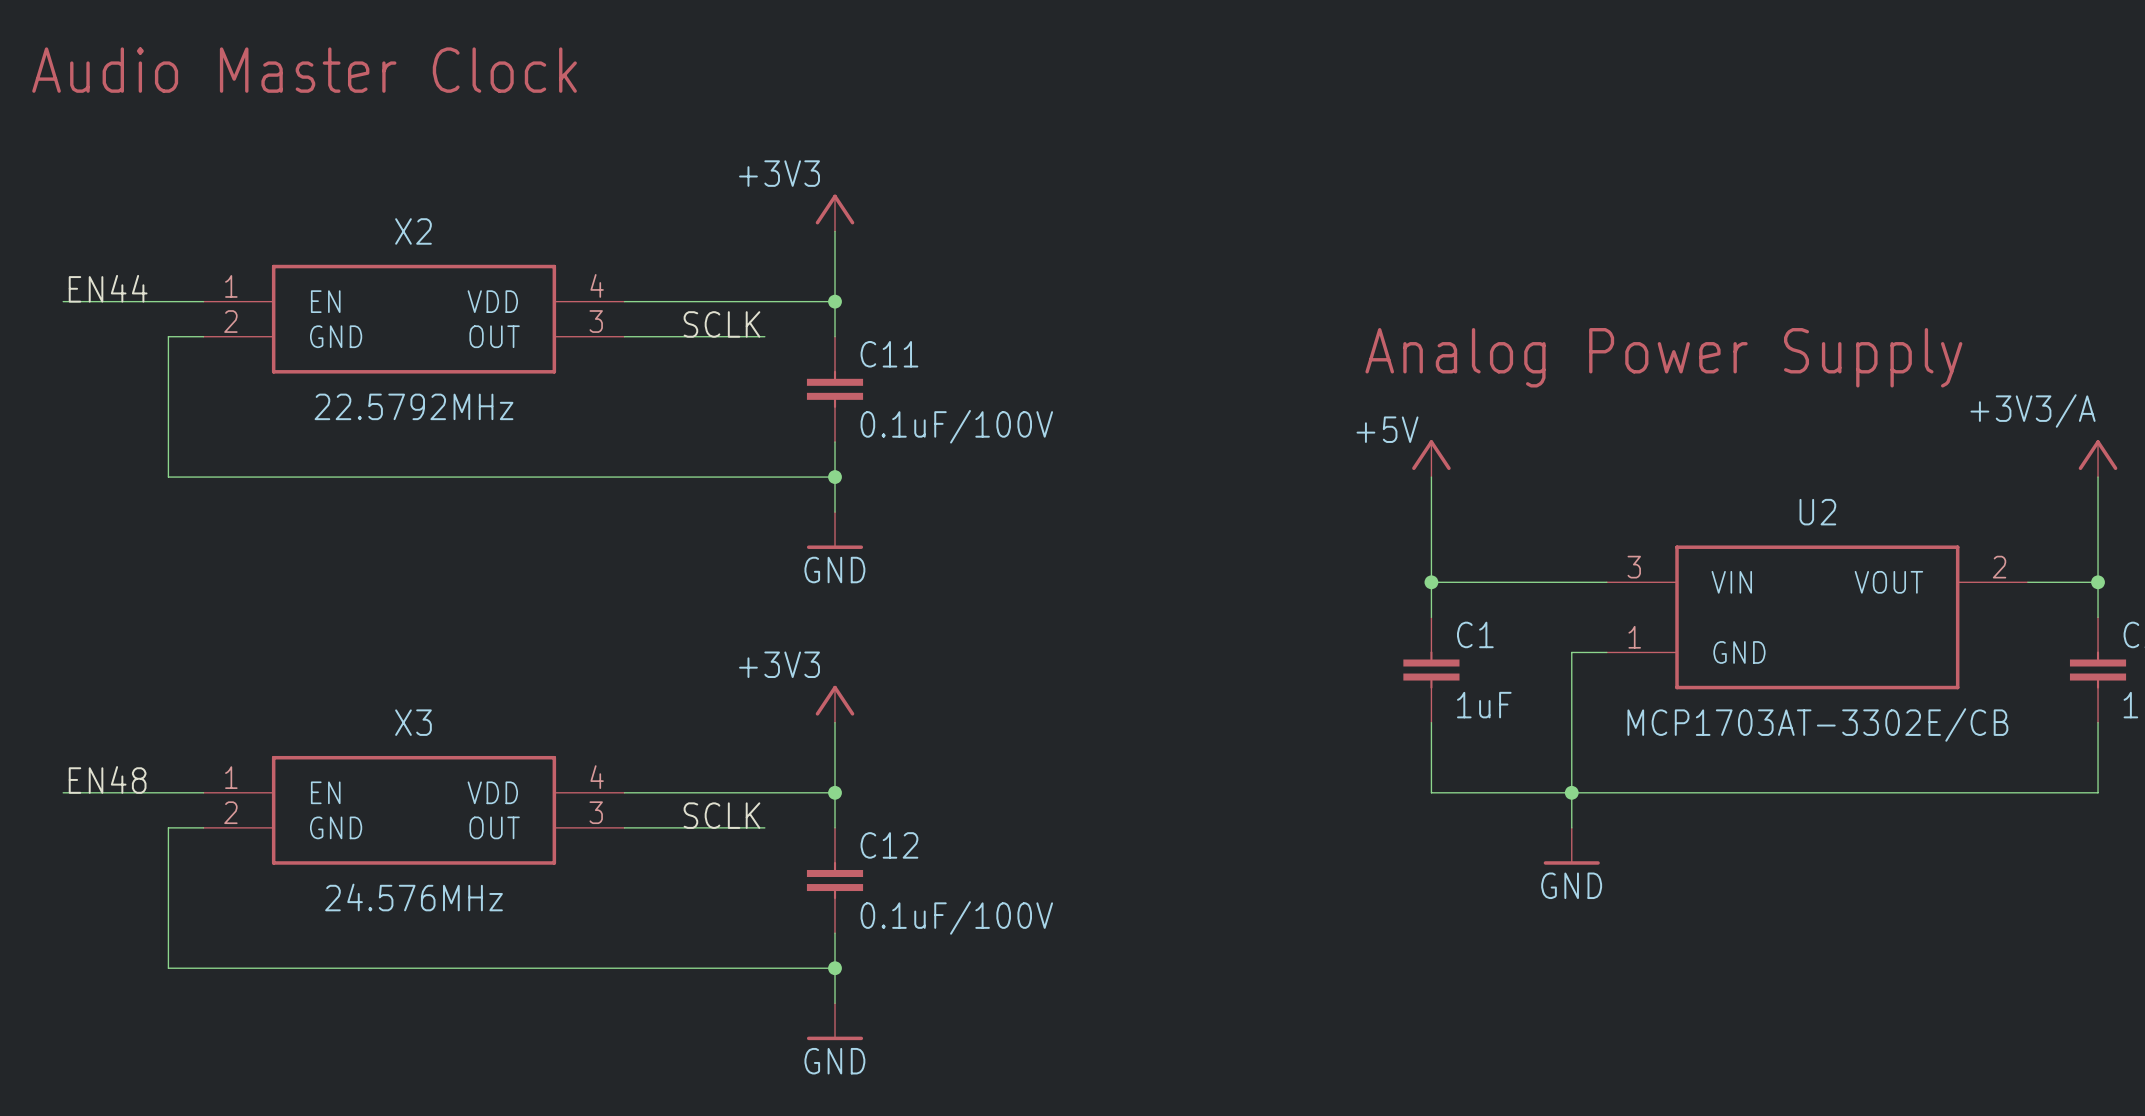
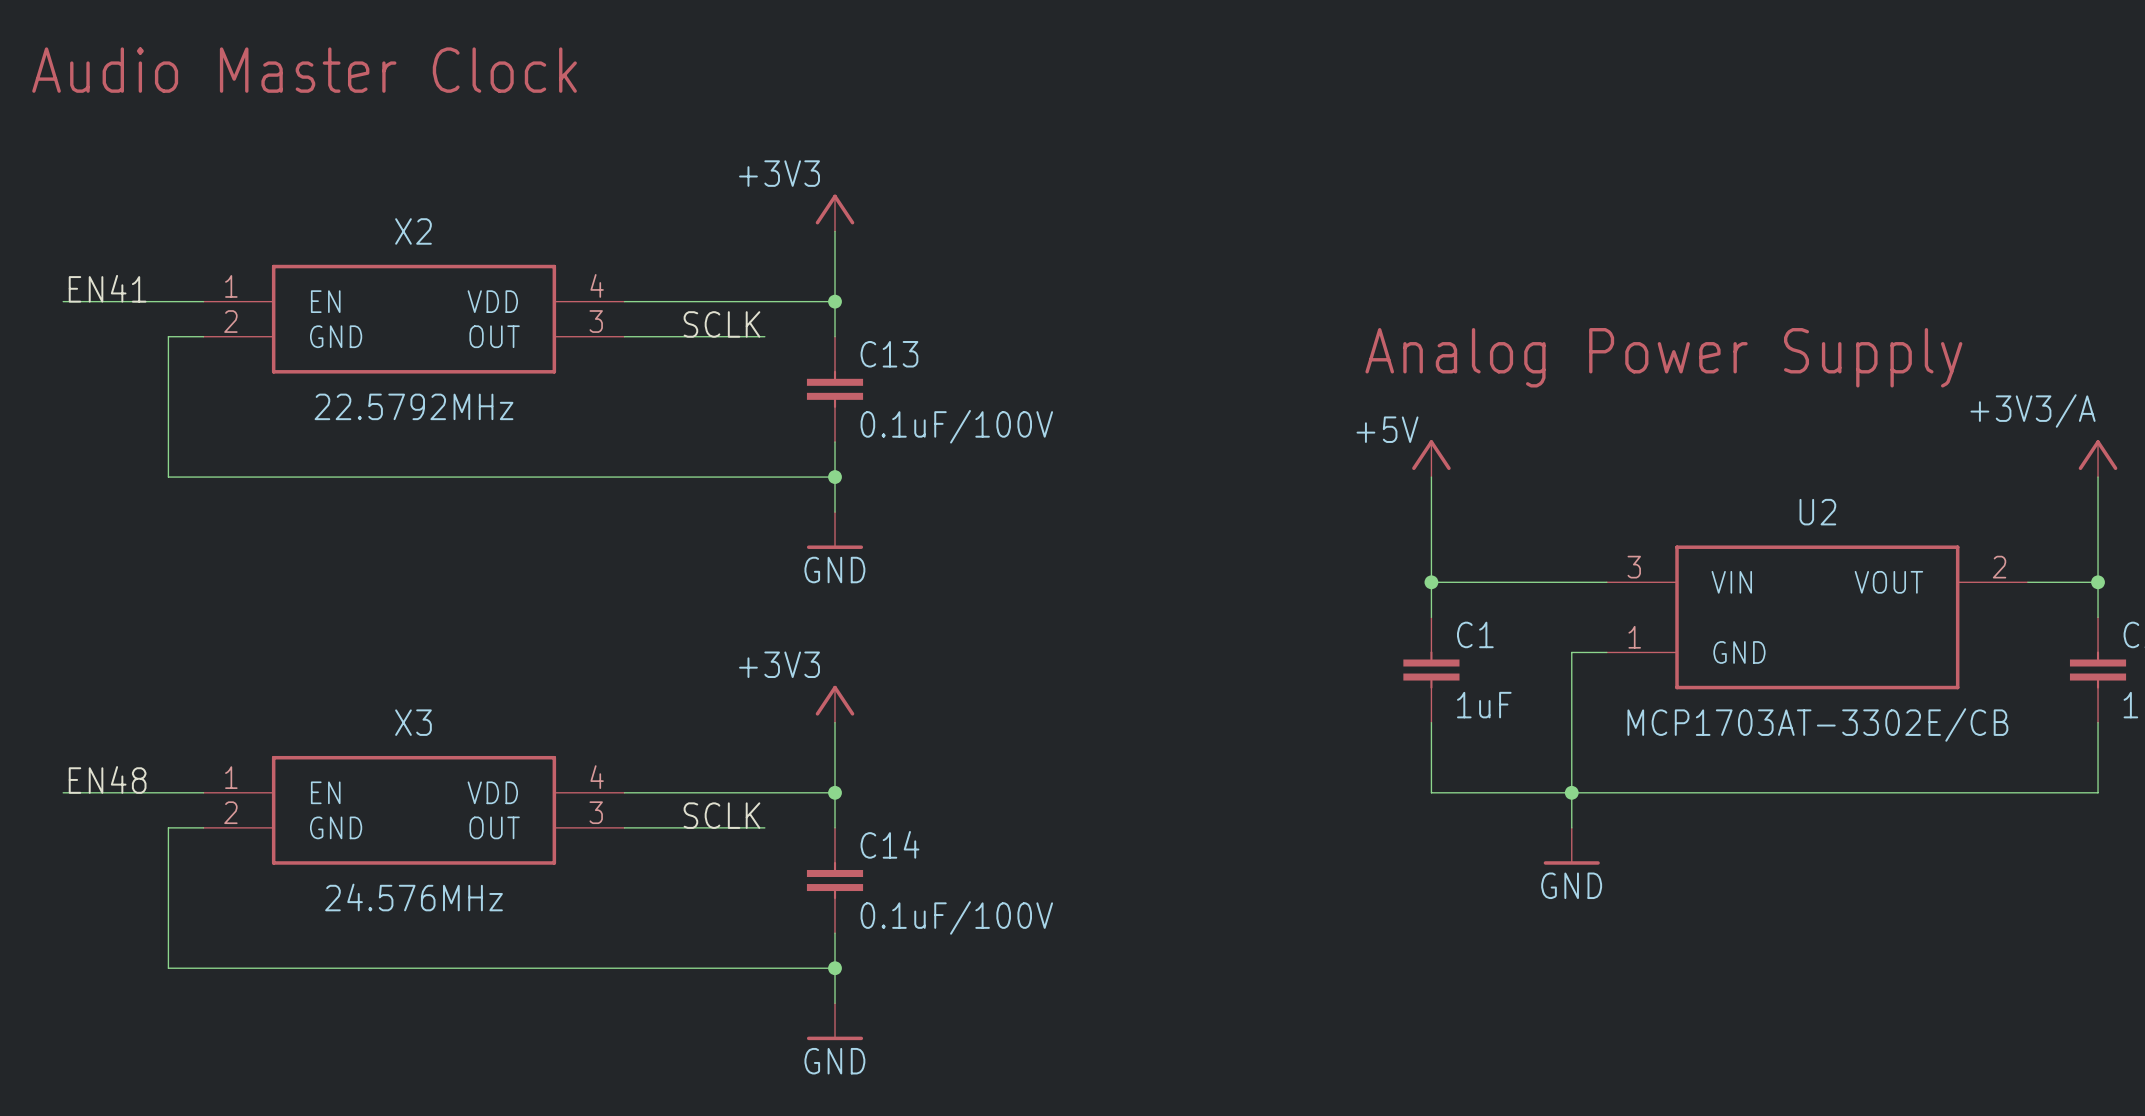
label: EN44 (108, 288) -> EN41 (107, 288)
C11 name: C11 (889, 354) -> C13 (889, 354)
C12 name: C12 (889, 845) -> C14 (889, 844)

